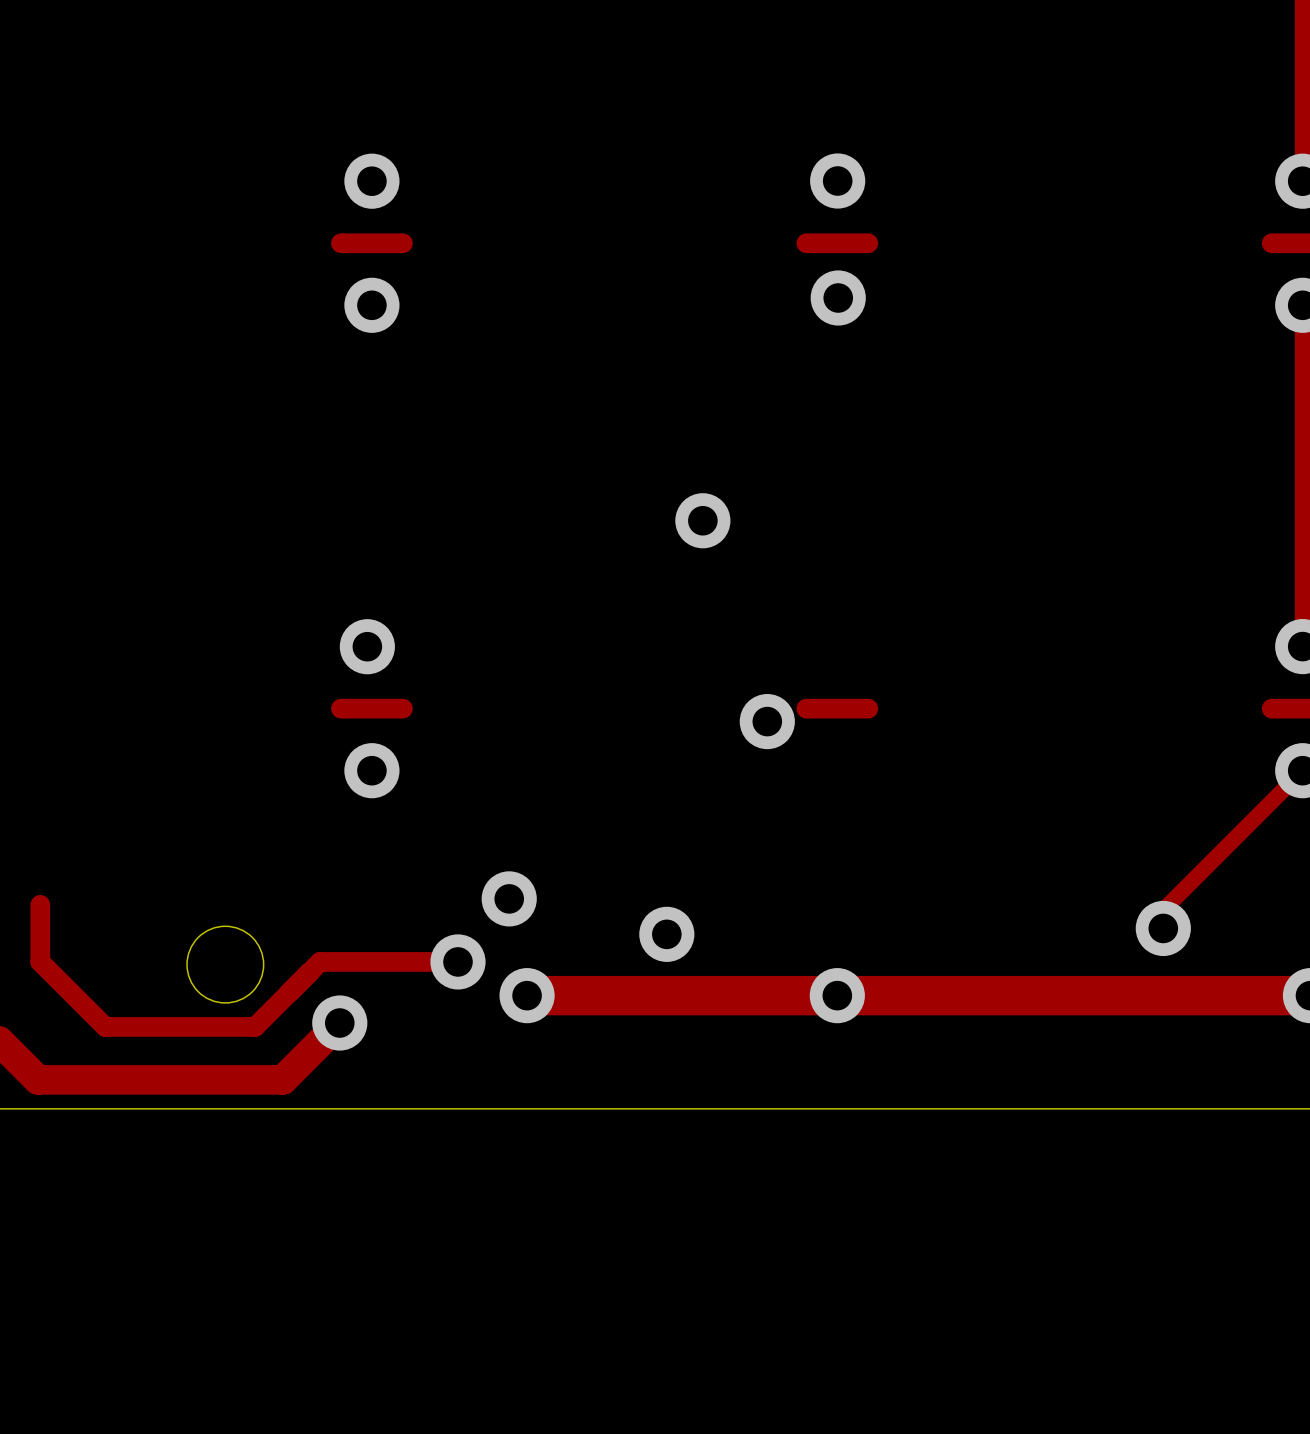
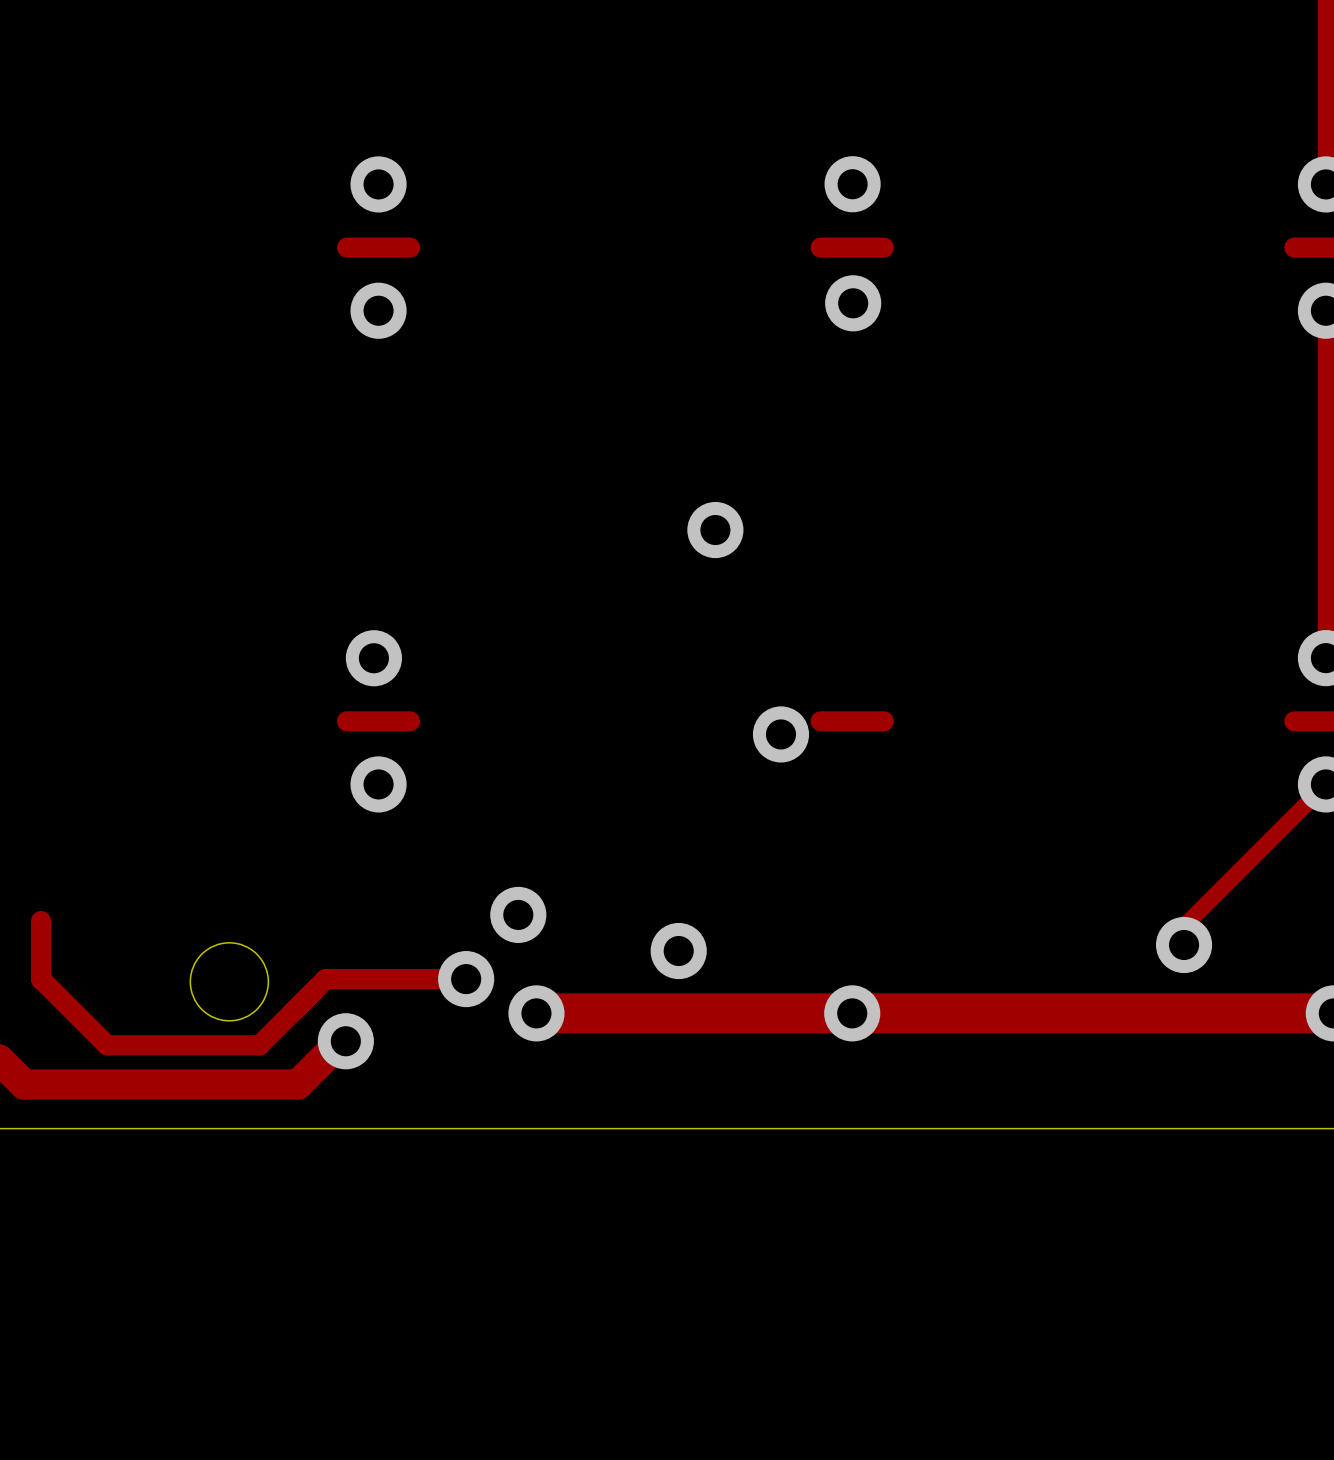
track: (339, 1023) (282, 1079) (38, 1079) (23, 1065) -> (345, 1036) (297, 1084) (24, 1084)

